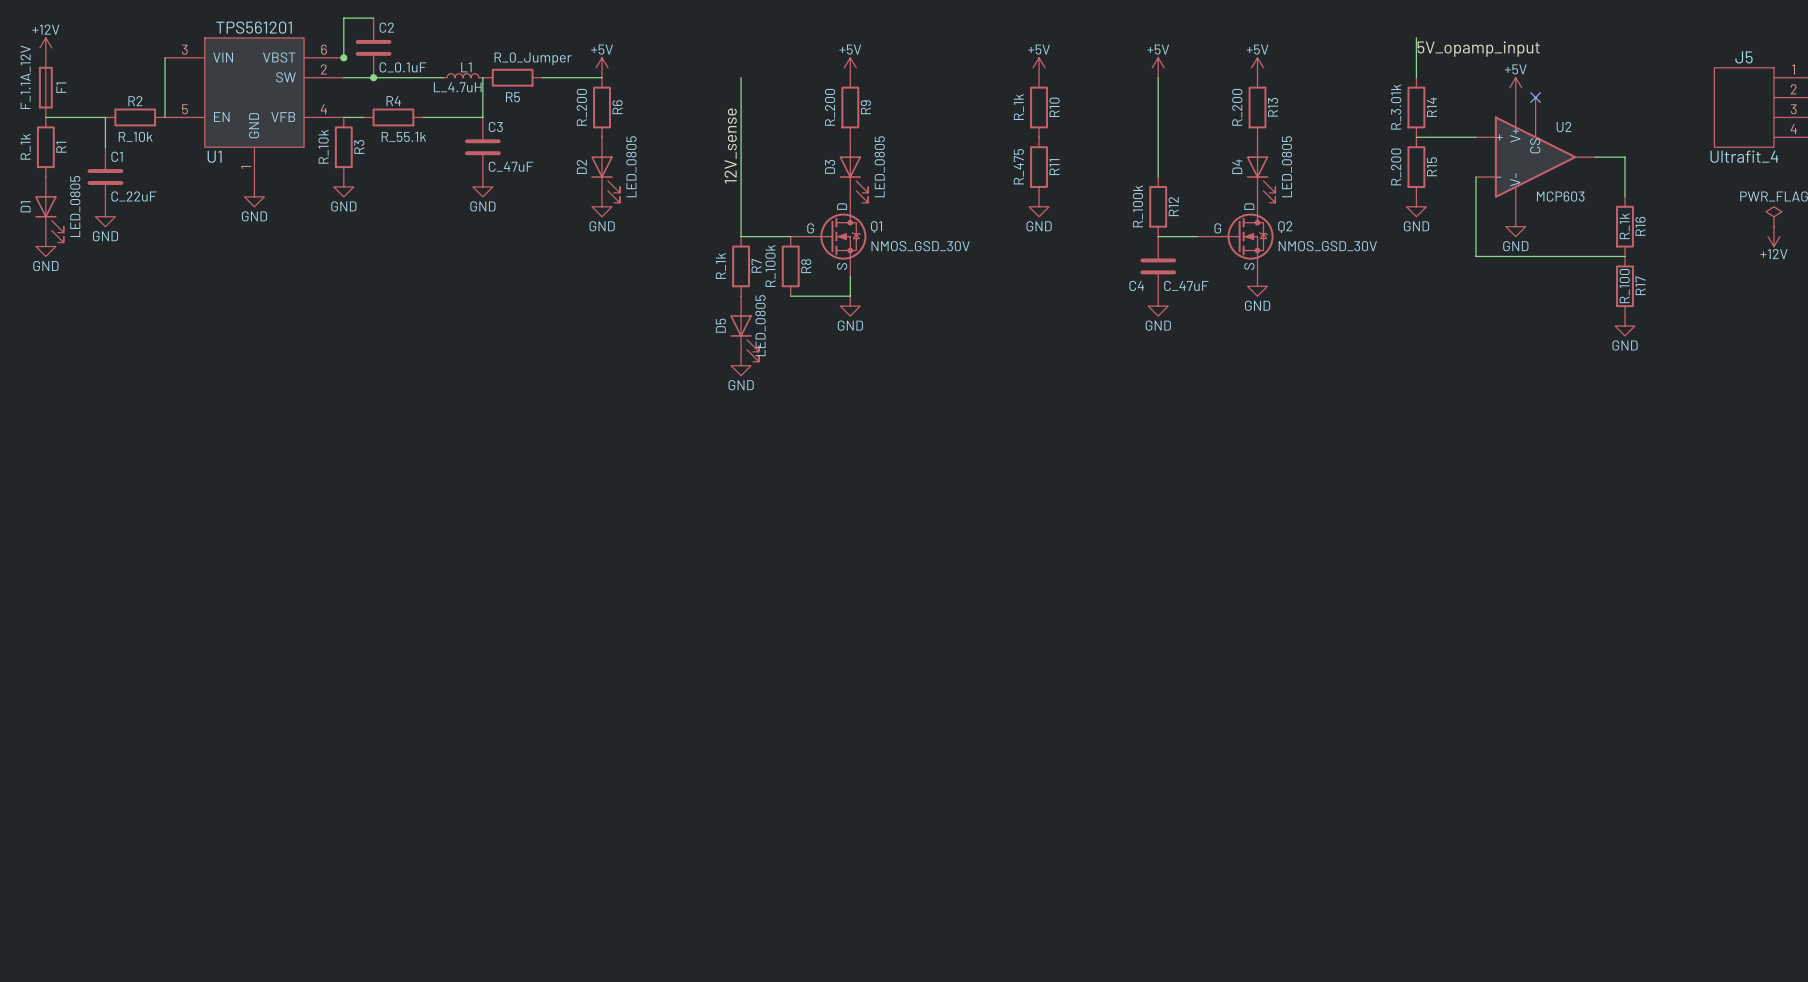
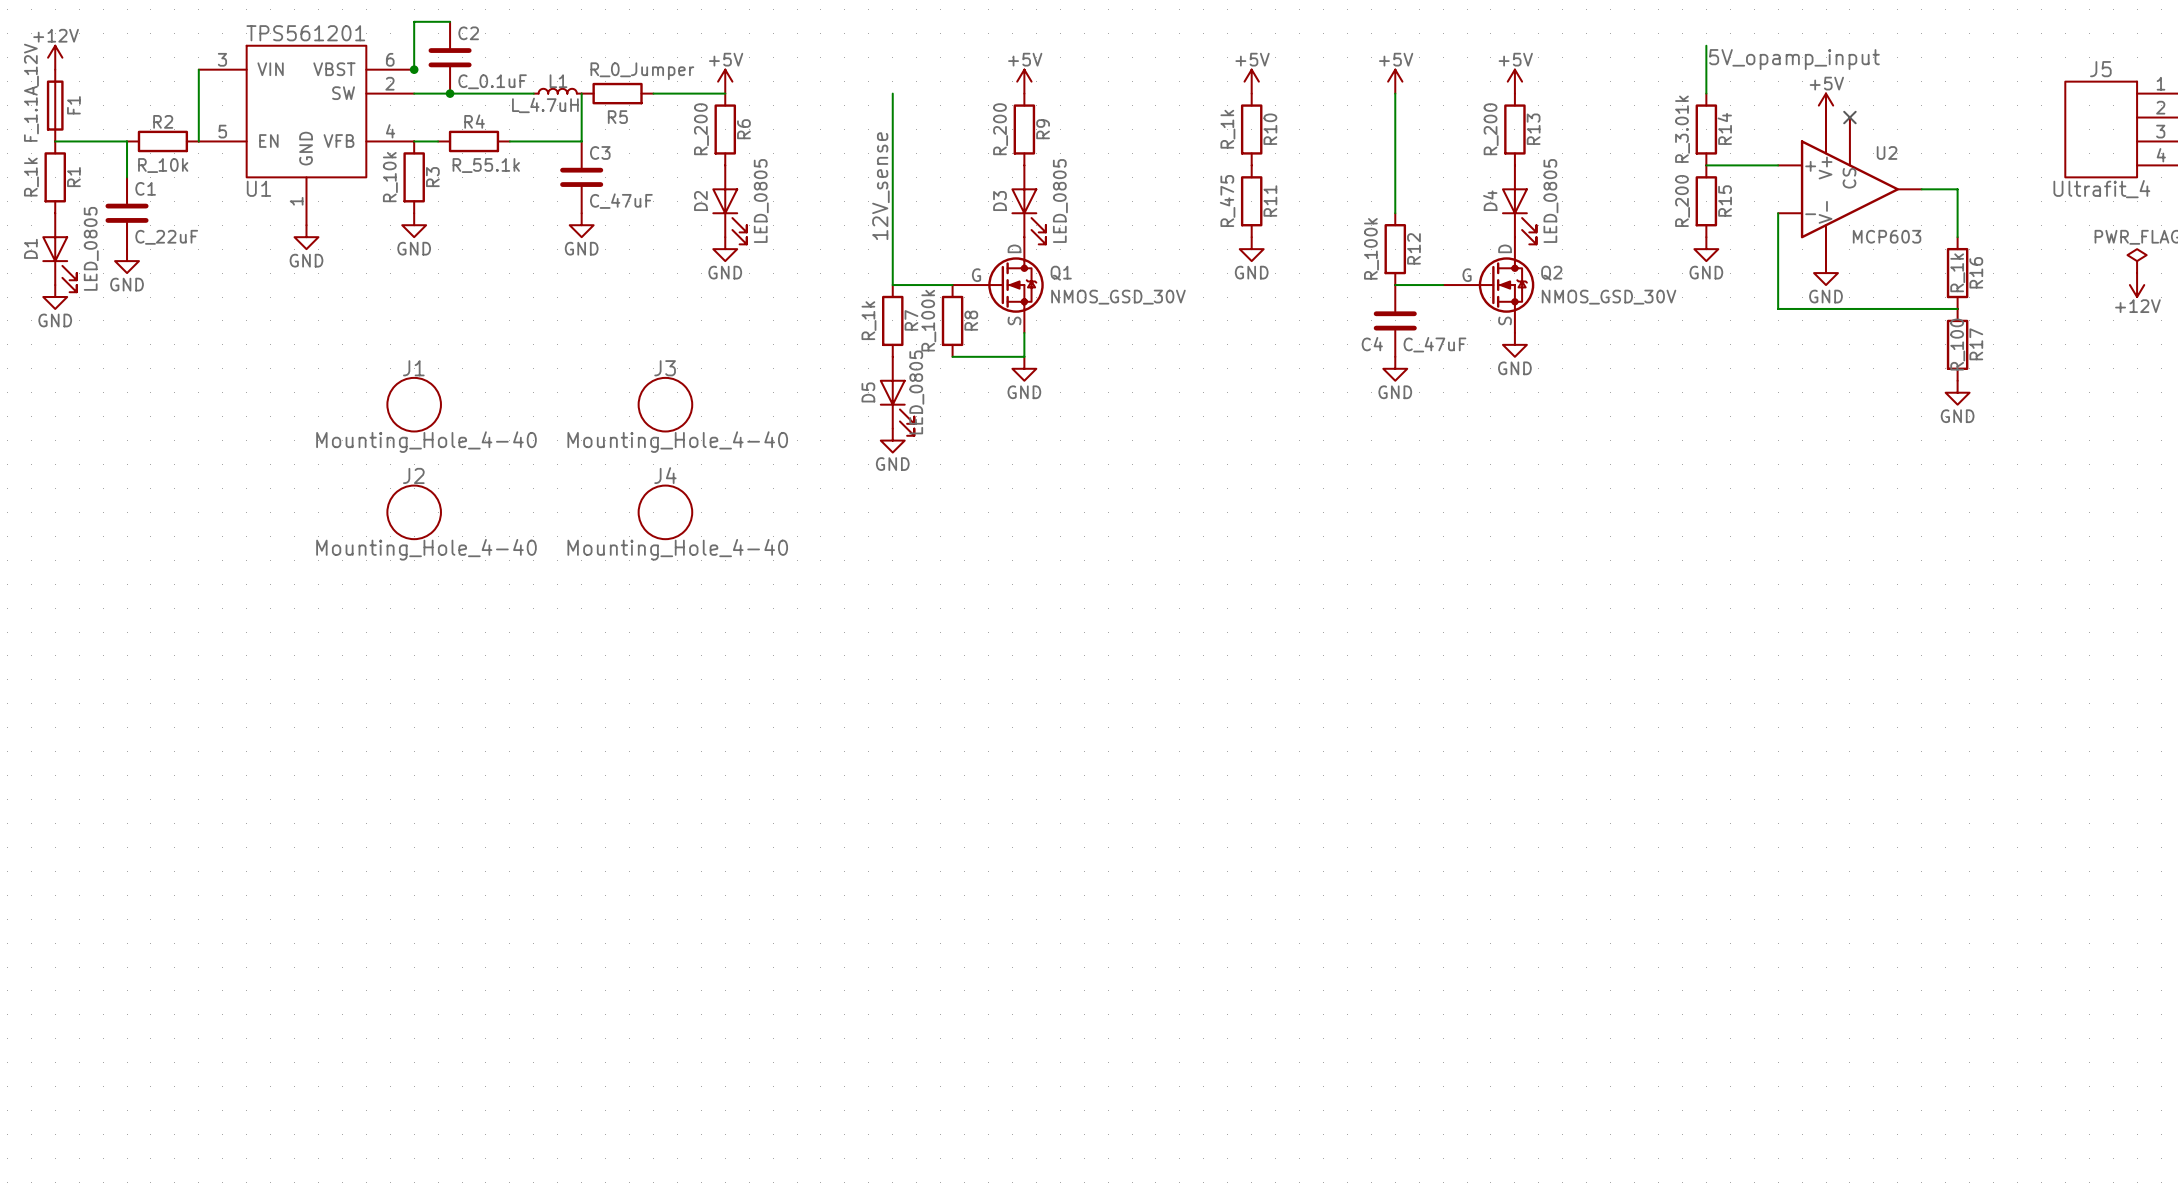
J1: none -> Mounting_Hole_4-40 (414, 404)
J3: none -> Mounting_Hole_4-40 (665, 404)
J2: none -> Mounting_Hole_4-40 (414, 512)
J4: none -> Mounting_Hole_4-40 (665, 512)

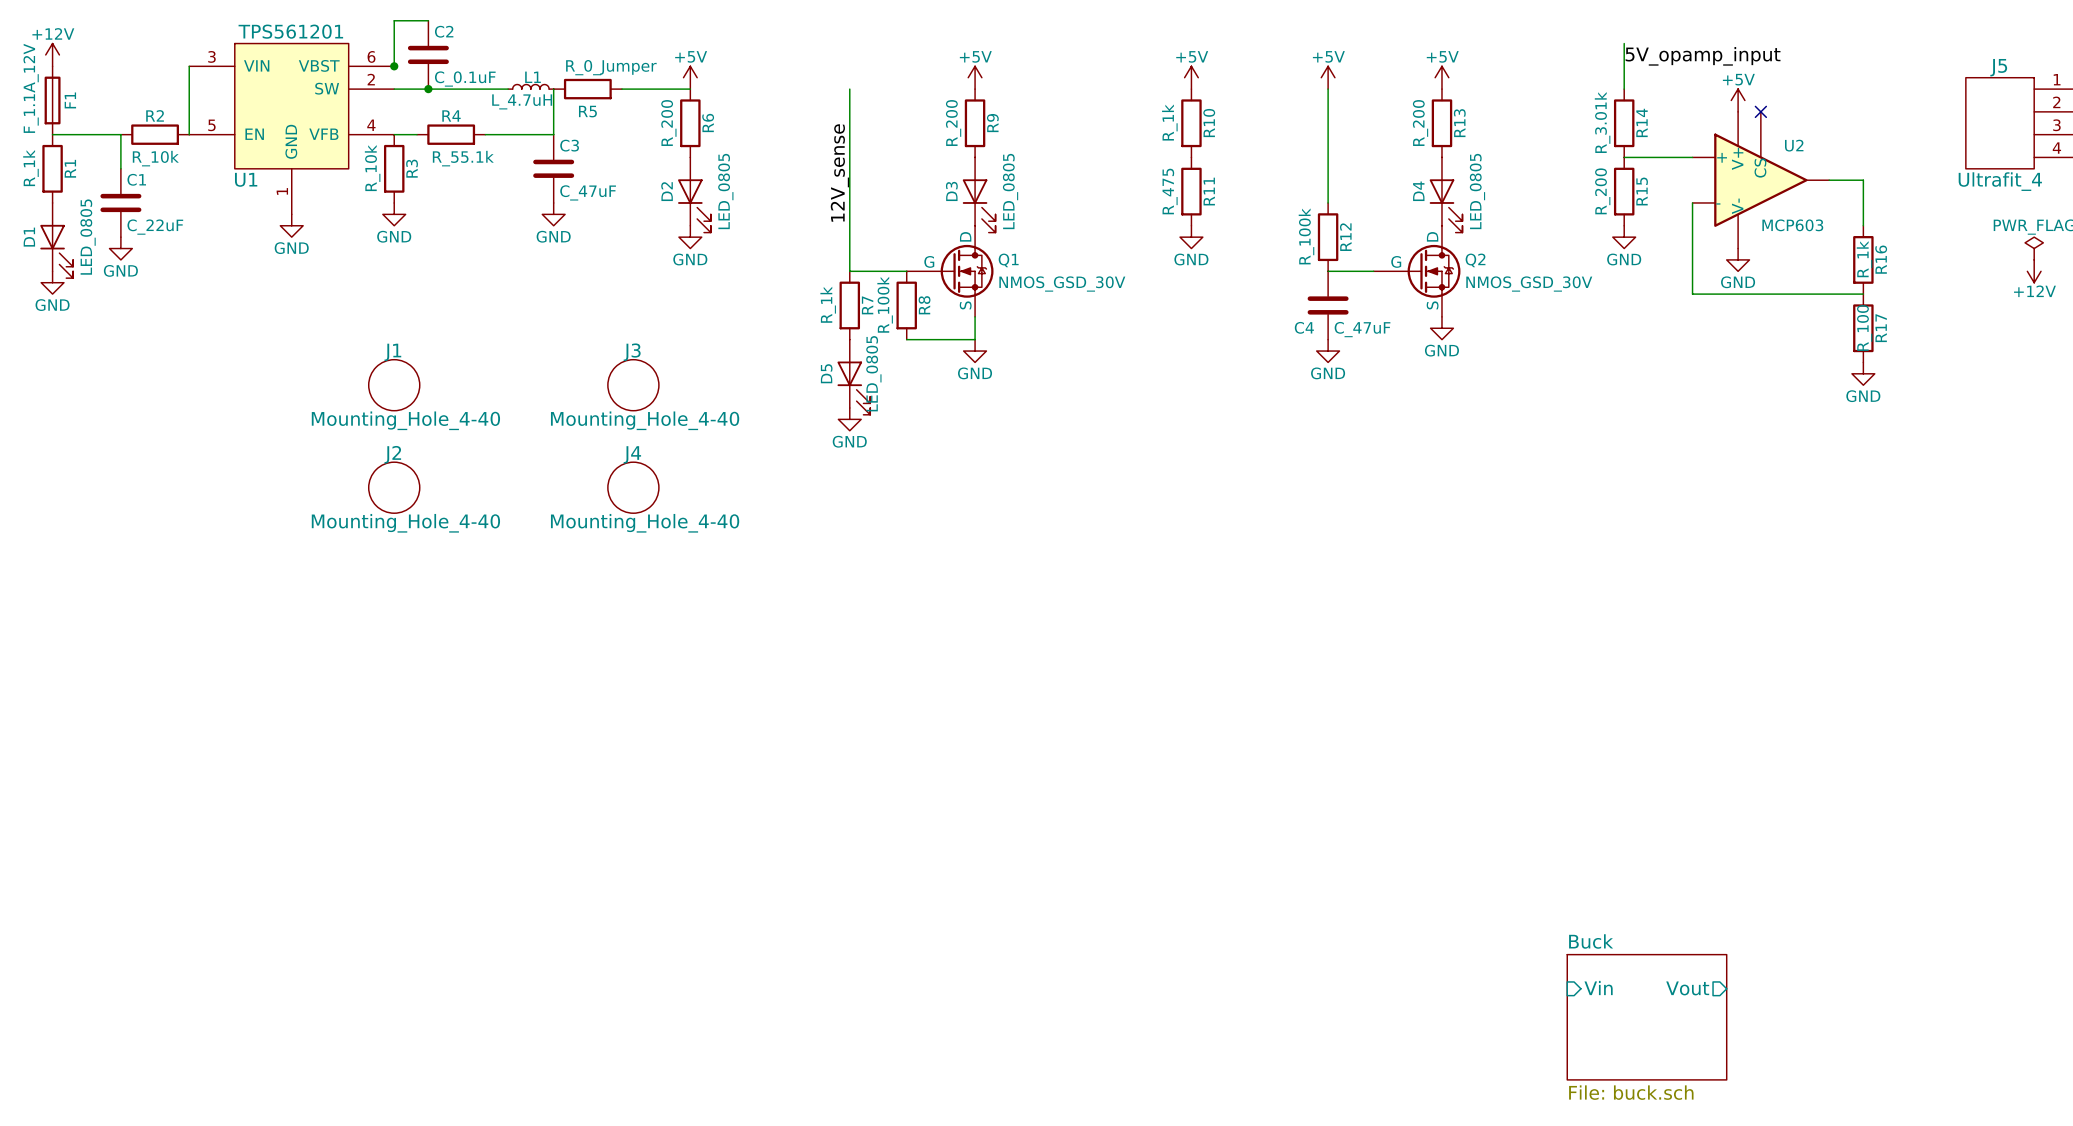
sheet pin: none -> Vin (1598, 988)
sheet pin: none -> Vout (1687, 988)
sheet Buck: none -> File: buck.sch (1646, 1017)

